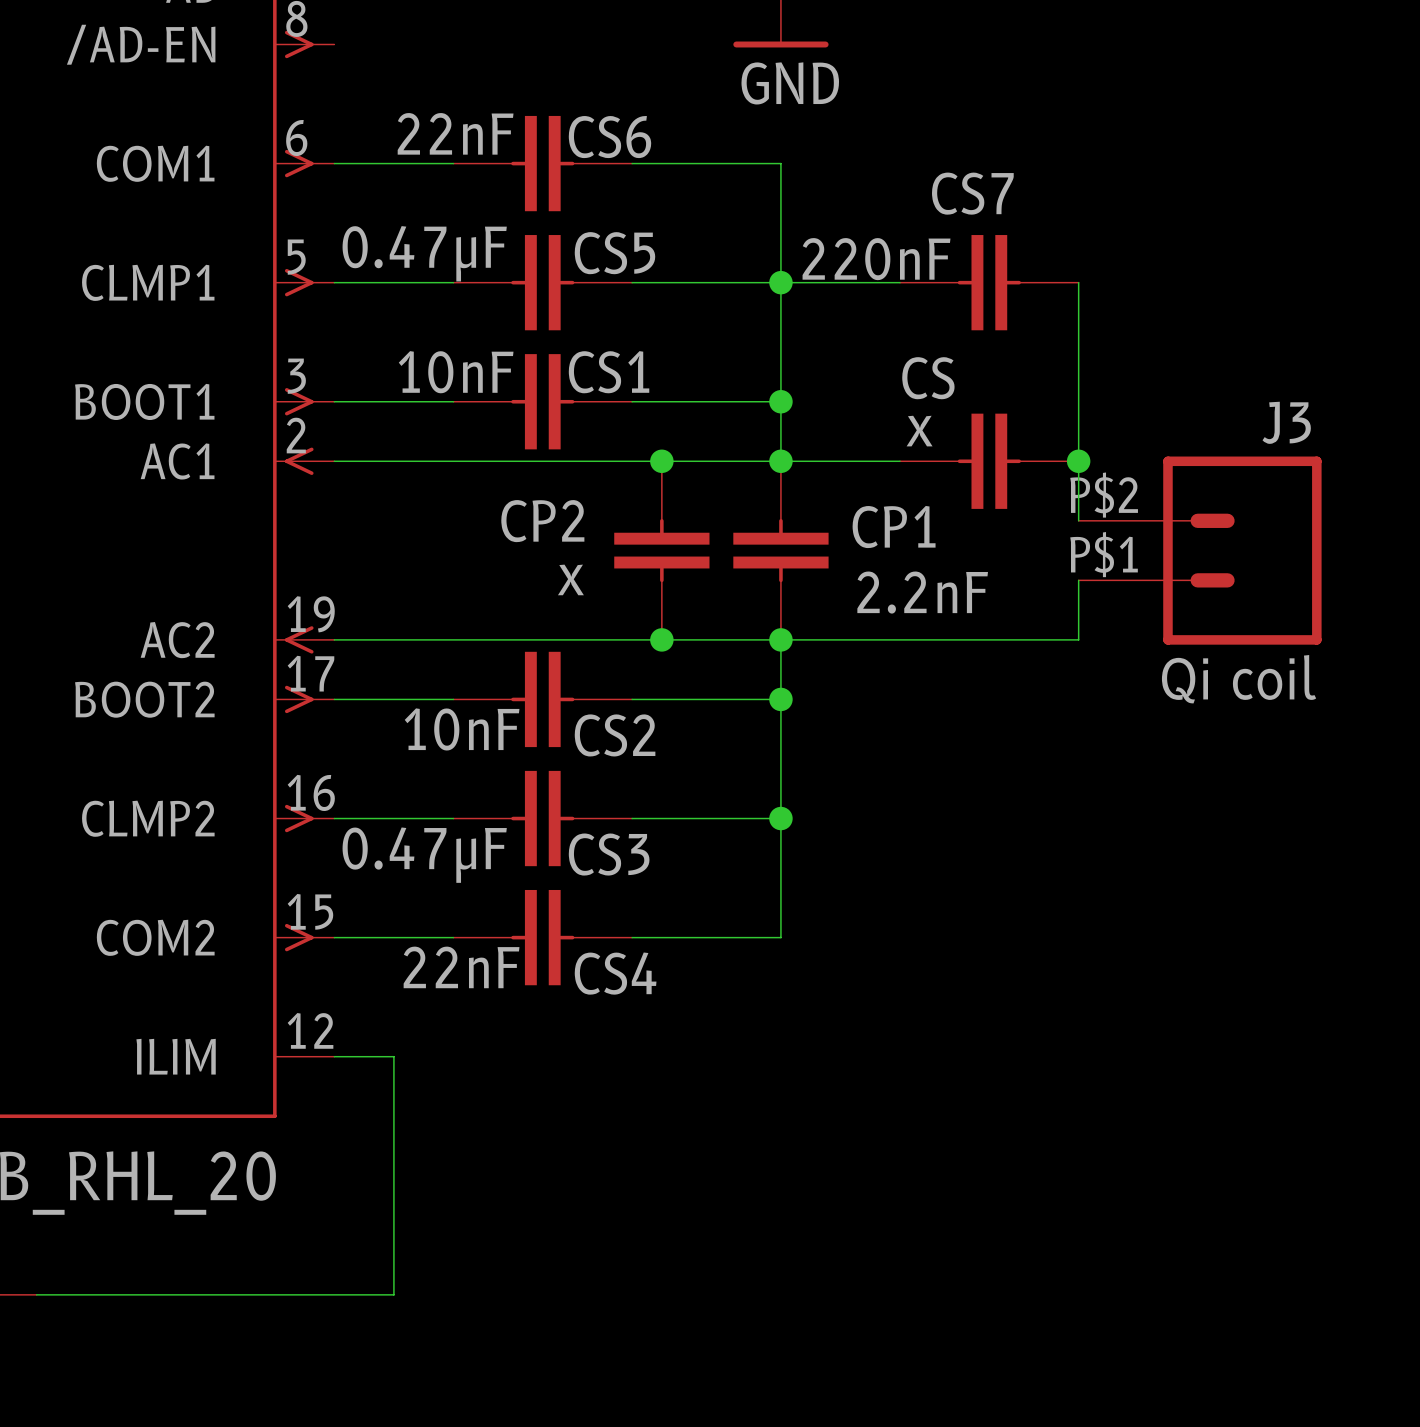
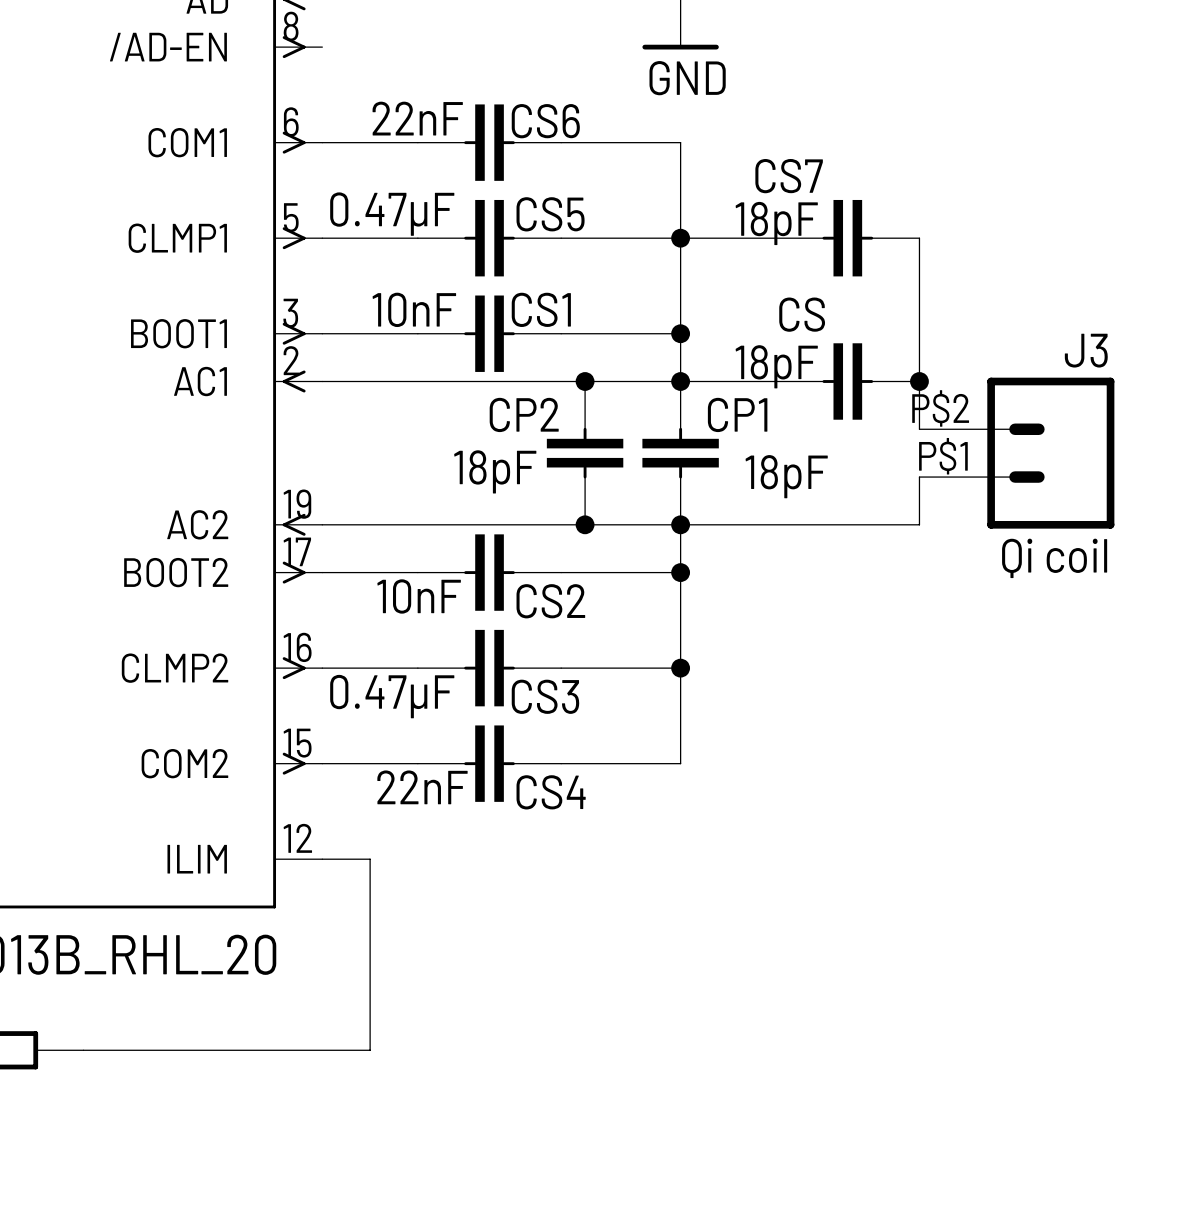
CS7 name position: CS7 (972, 193) -> CS7 (789, 176)
CS7 value: 220nF (876, 259) -> 18pF (776, 223)
CS value: x (919, 431) -> 18pF (776, 366)
CP2 name position: CP2 (542, 521) -> CP2 (524, 414)
CP1 name position: CP1 (894, 527) -> CP1 (737, 414)
CP2 value: x (570, 579) -> 18pF (495, 471)
CP1 value: 2.2nF (922, 592) -> 18pF (786, 476)

